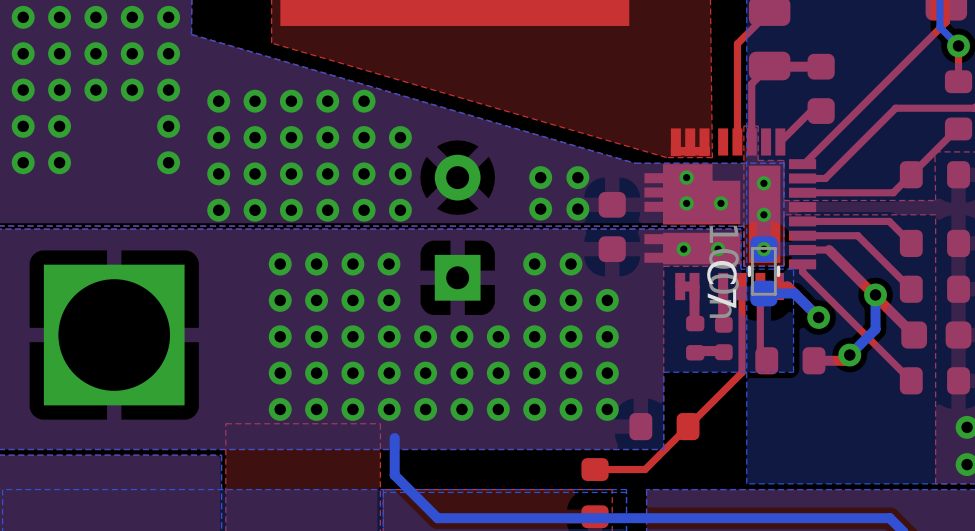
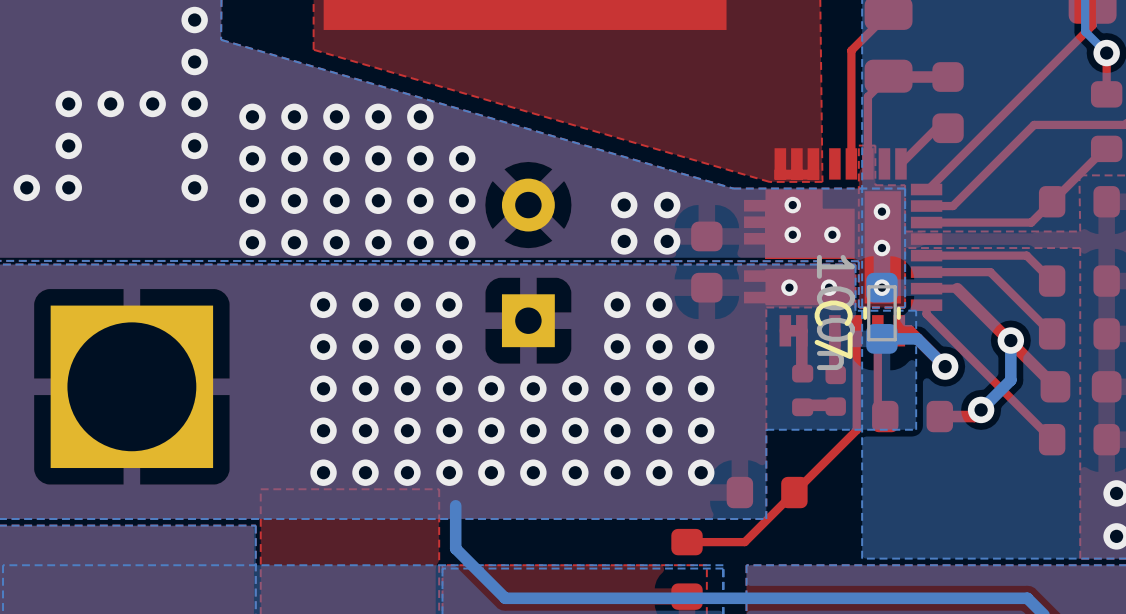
via: (23, 17) -> none
via: (59, 17) -> none
via: (95, 17) -> none
via: (132, 17) -> none
via: (23, 53) -> none
via: (59, 53) -> none
via: (95, 53) -> none
via: (132, 53) -> none
via: (23, 90) -> none
via: (23, 126) -> none

